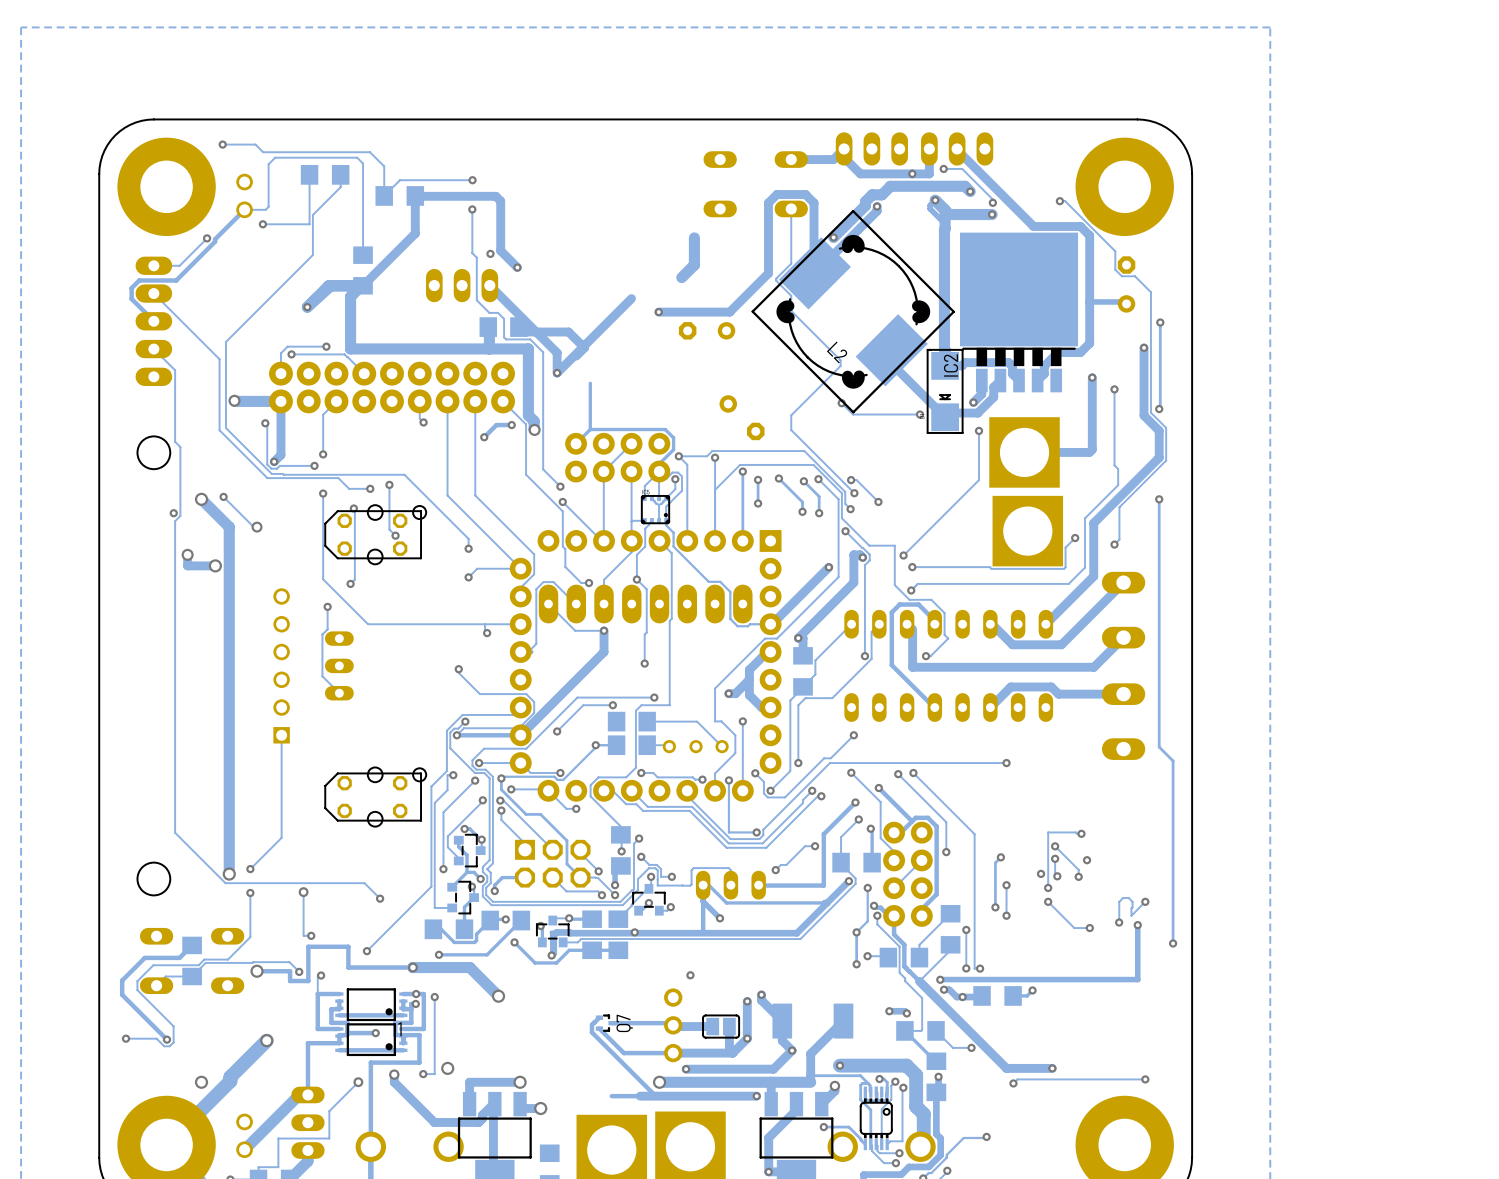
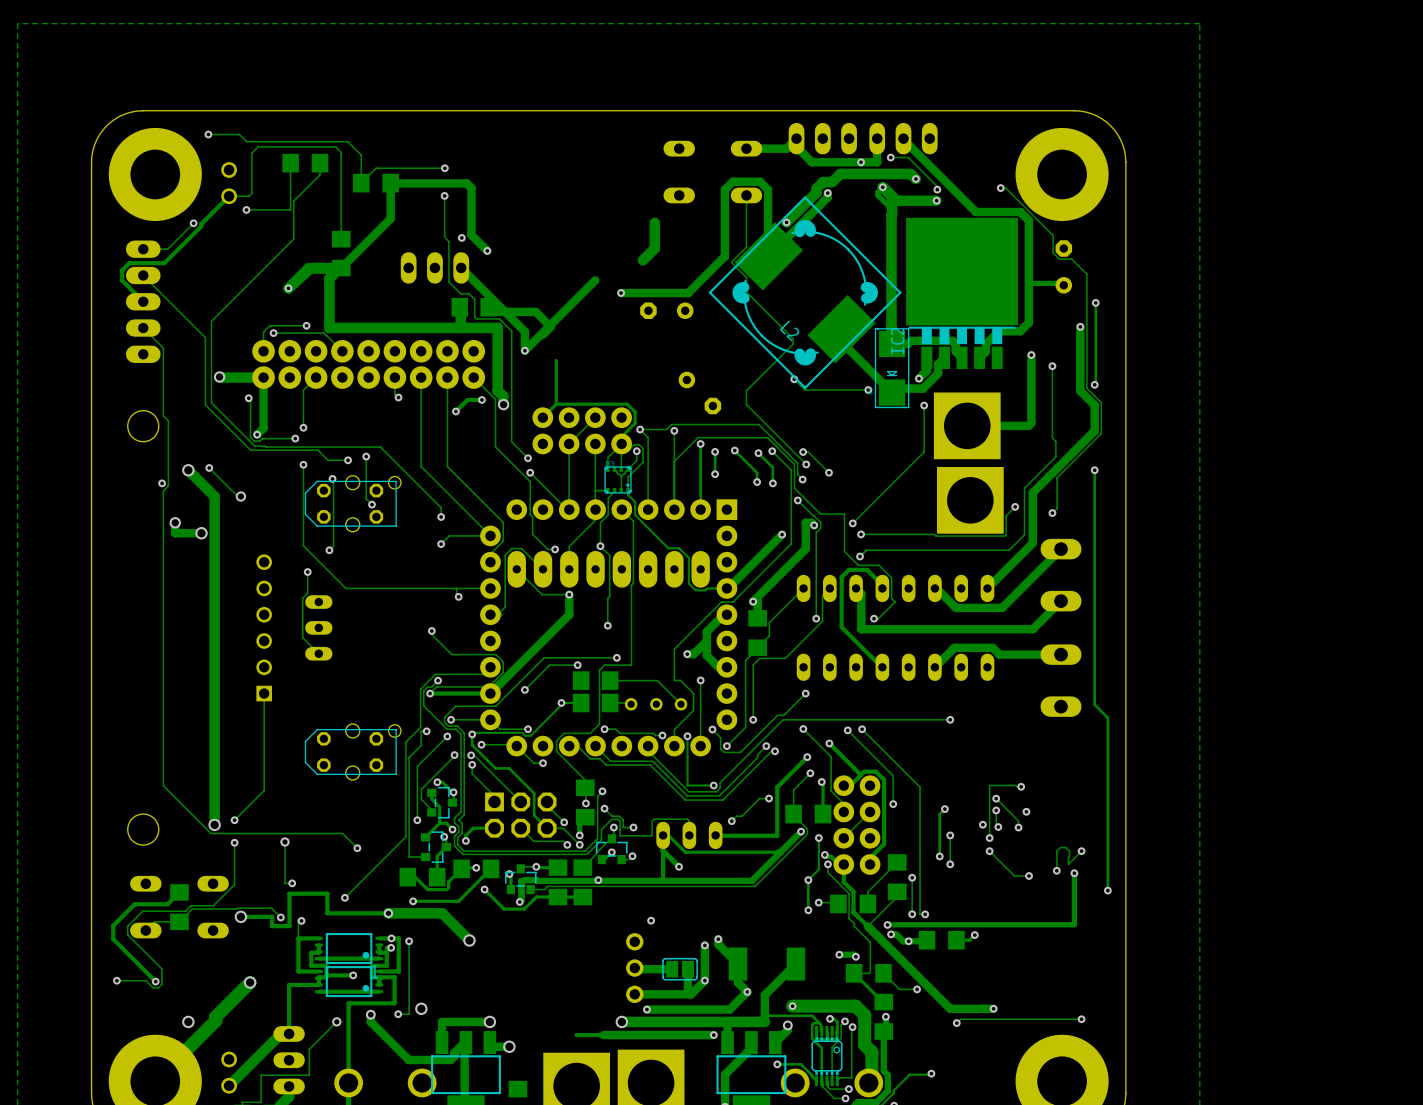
track: (599, 1017) (591, 1024) (591, 1032) (655, 1096) (756, 1096) -> none
Q7: (605, 1023) -> none
track: (611, 1023) (671, 1023) (674, 1026) -> none
track: (599, 1028) (623, 1053) (673, 1053) -> none

